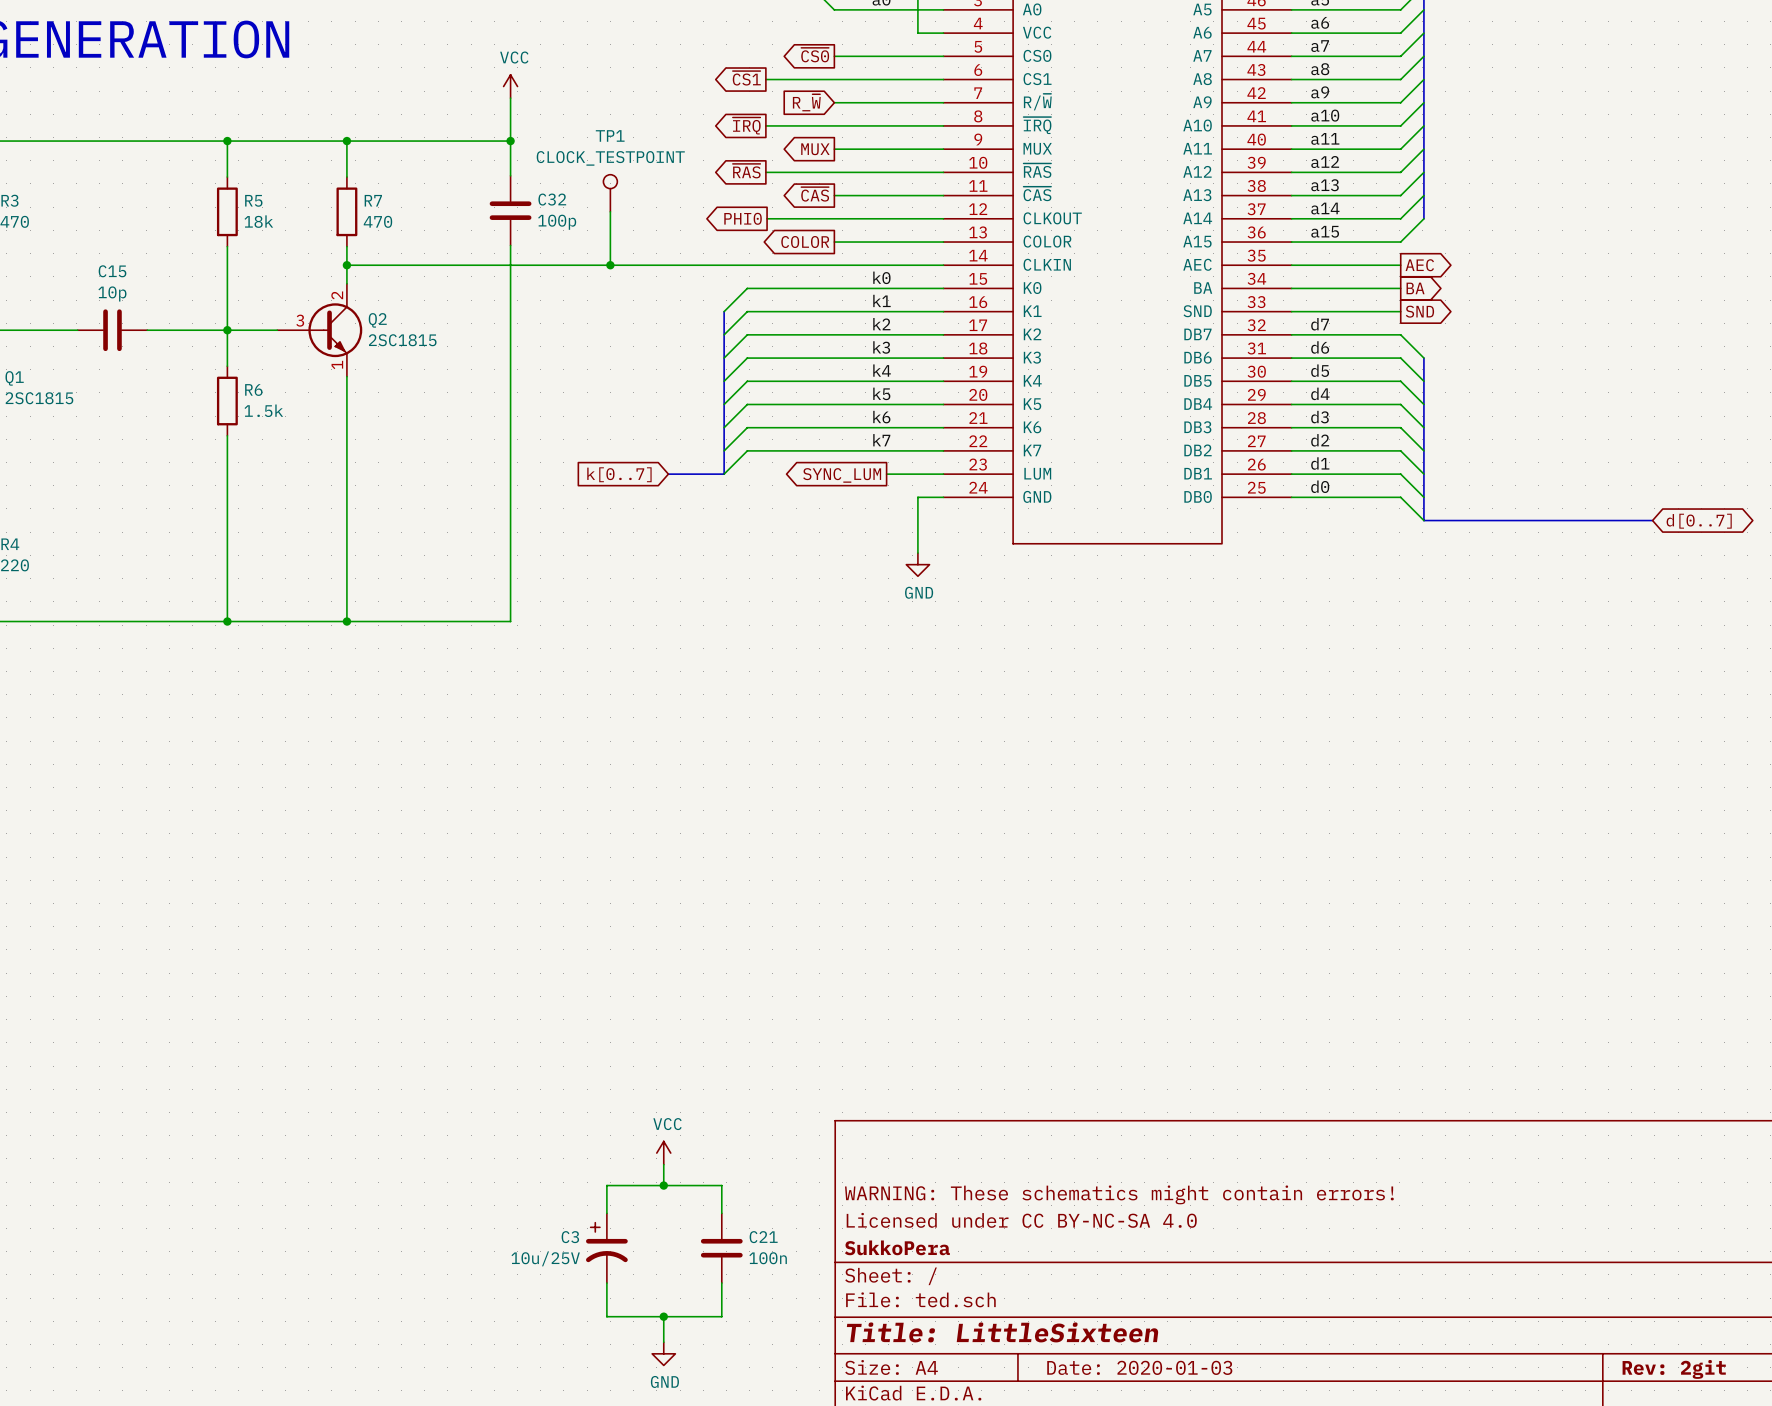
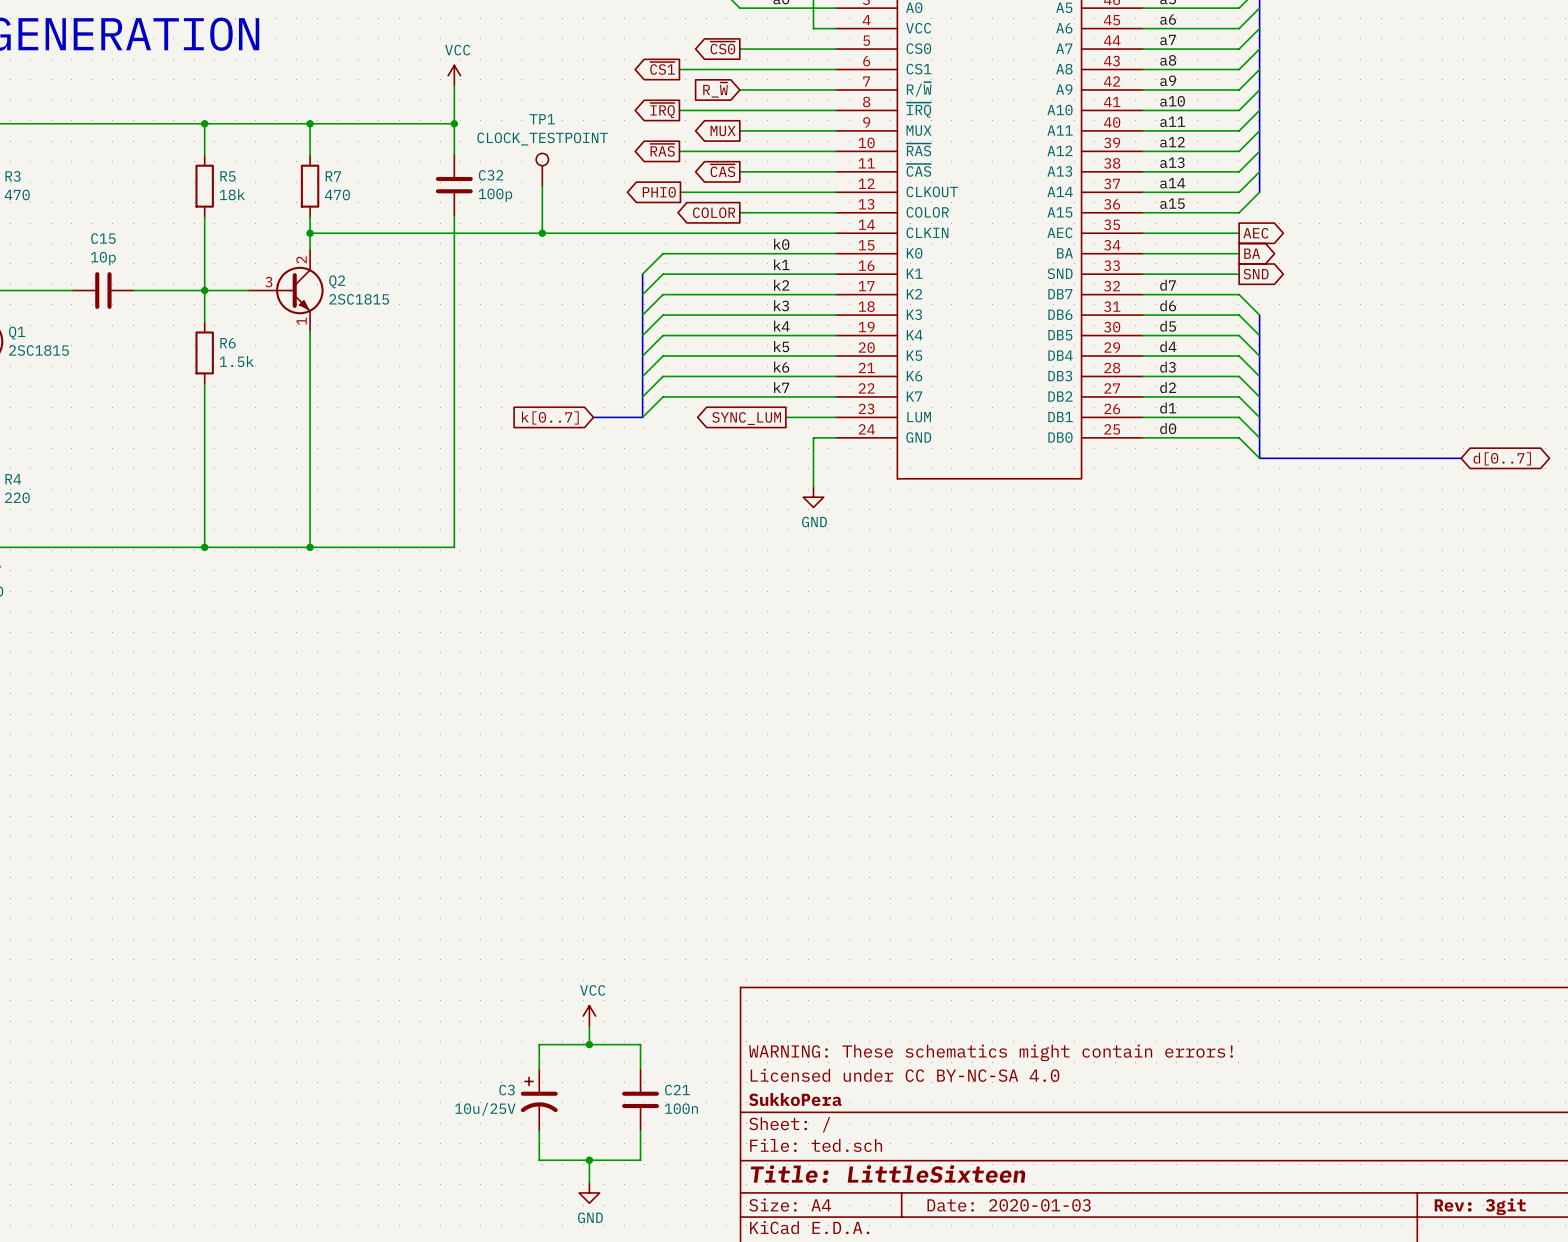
title block: Rev: 2git (1674, 1369) -> Rev: 3git (1480, 1206)

